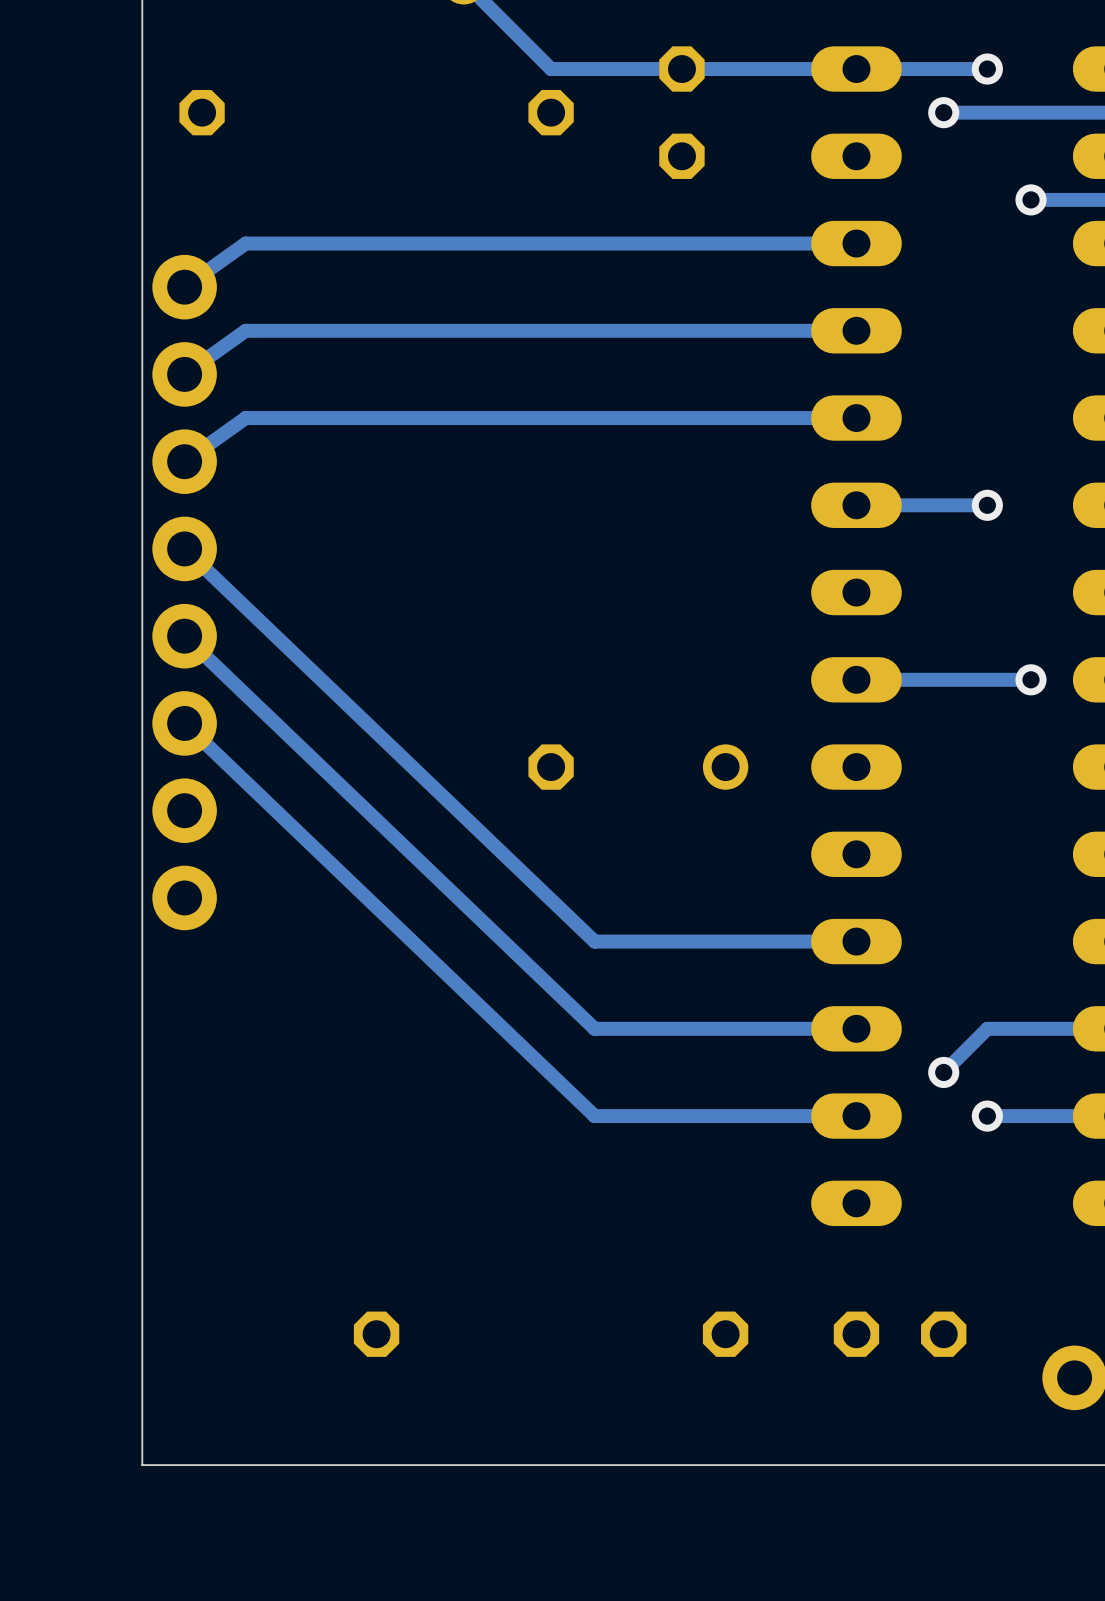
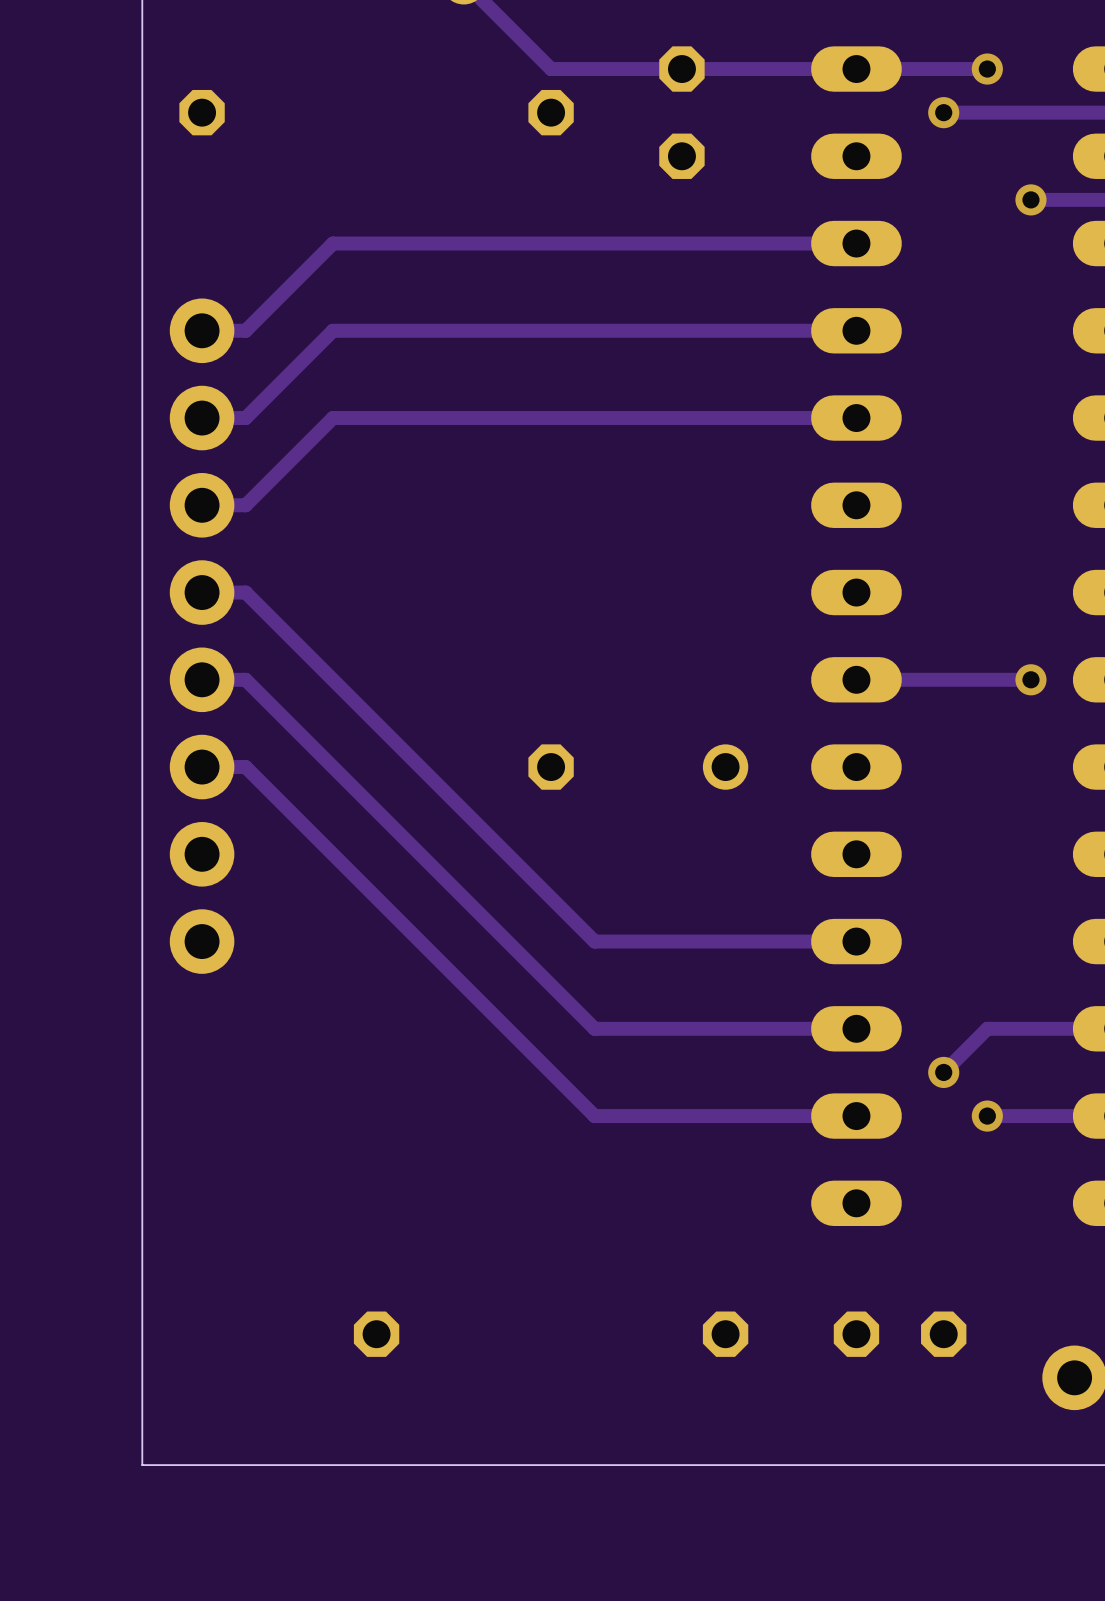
track: (332, 243) (245, 243) (184, 287) -> (332, 243) (245, 330) (202, 330)
track: (332, 330) (245, 330) (184, 374) -> (332, 330) (245, 418) (202, 418)
track: (332, 418) (245, 418) (184, 461) -> (332, 418) (245, 505) (202, 505)
track: (987, 505) (856, 505) -> none
via: (987, 505) -> none
track: (184, 548) (594, 941) -> (202, 592) (245, 592) (594, 941)
part position: (184, 592) -> (202, 636)
track: (184, 636) (594, 1028) -> (202, 679) (245, 679) (594, 1028)
track: (184, 723) (594, 1116) -> (202, 767) (245, 767) (594, 1116)

